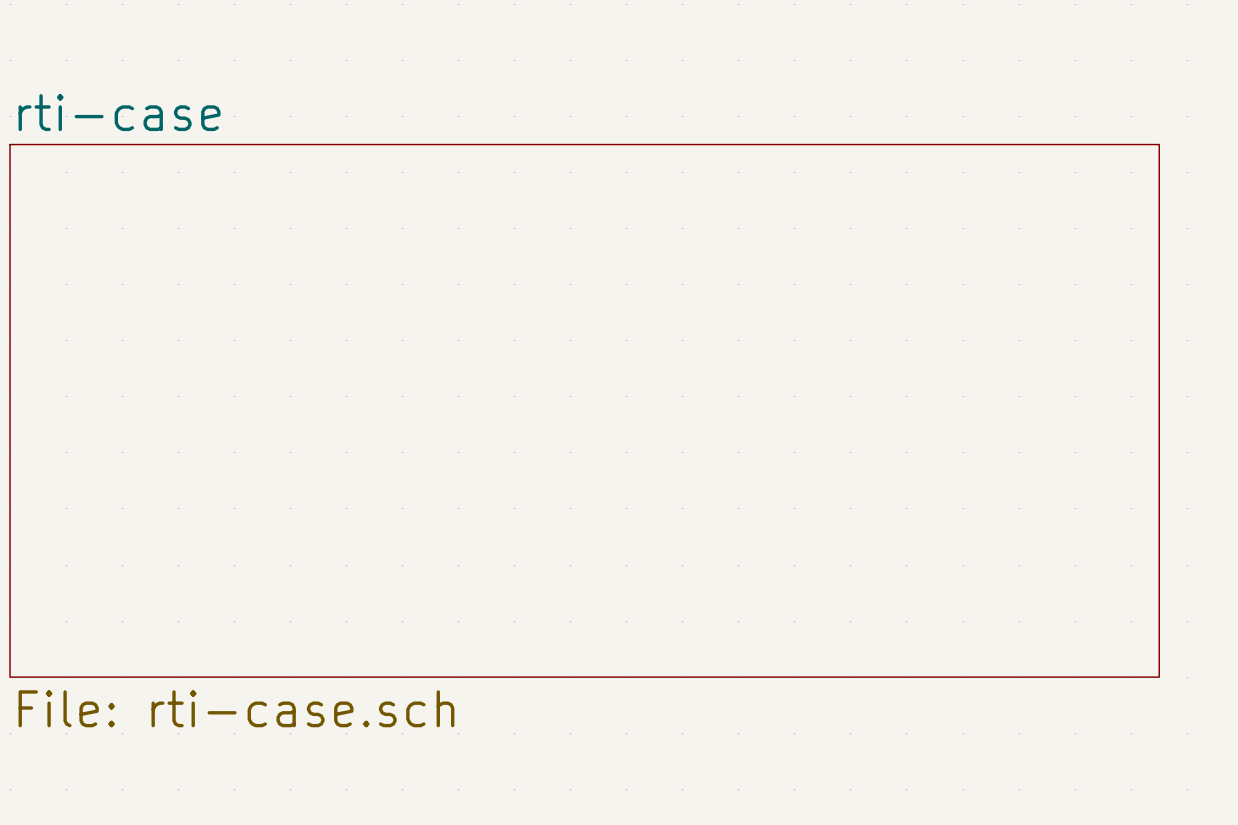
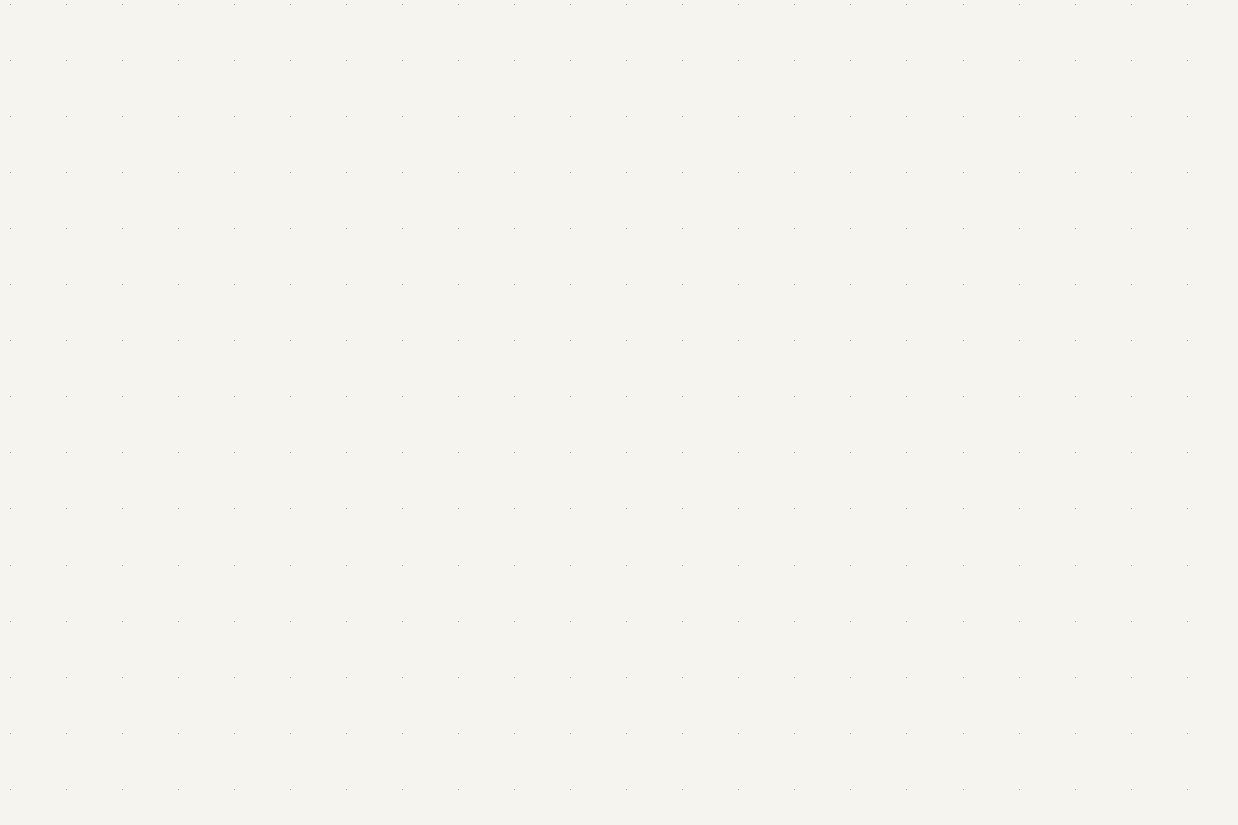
sheet rti-case: File: rti-case.sch (584, 410) -> none

